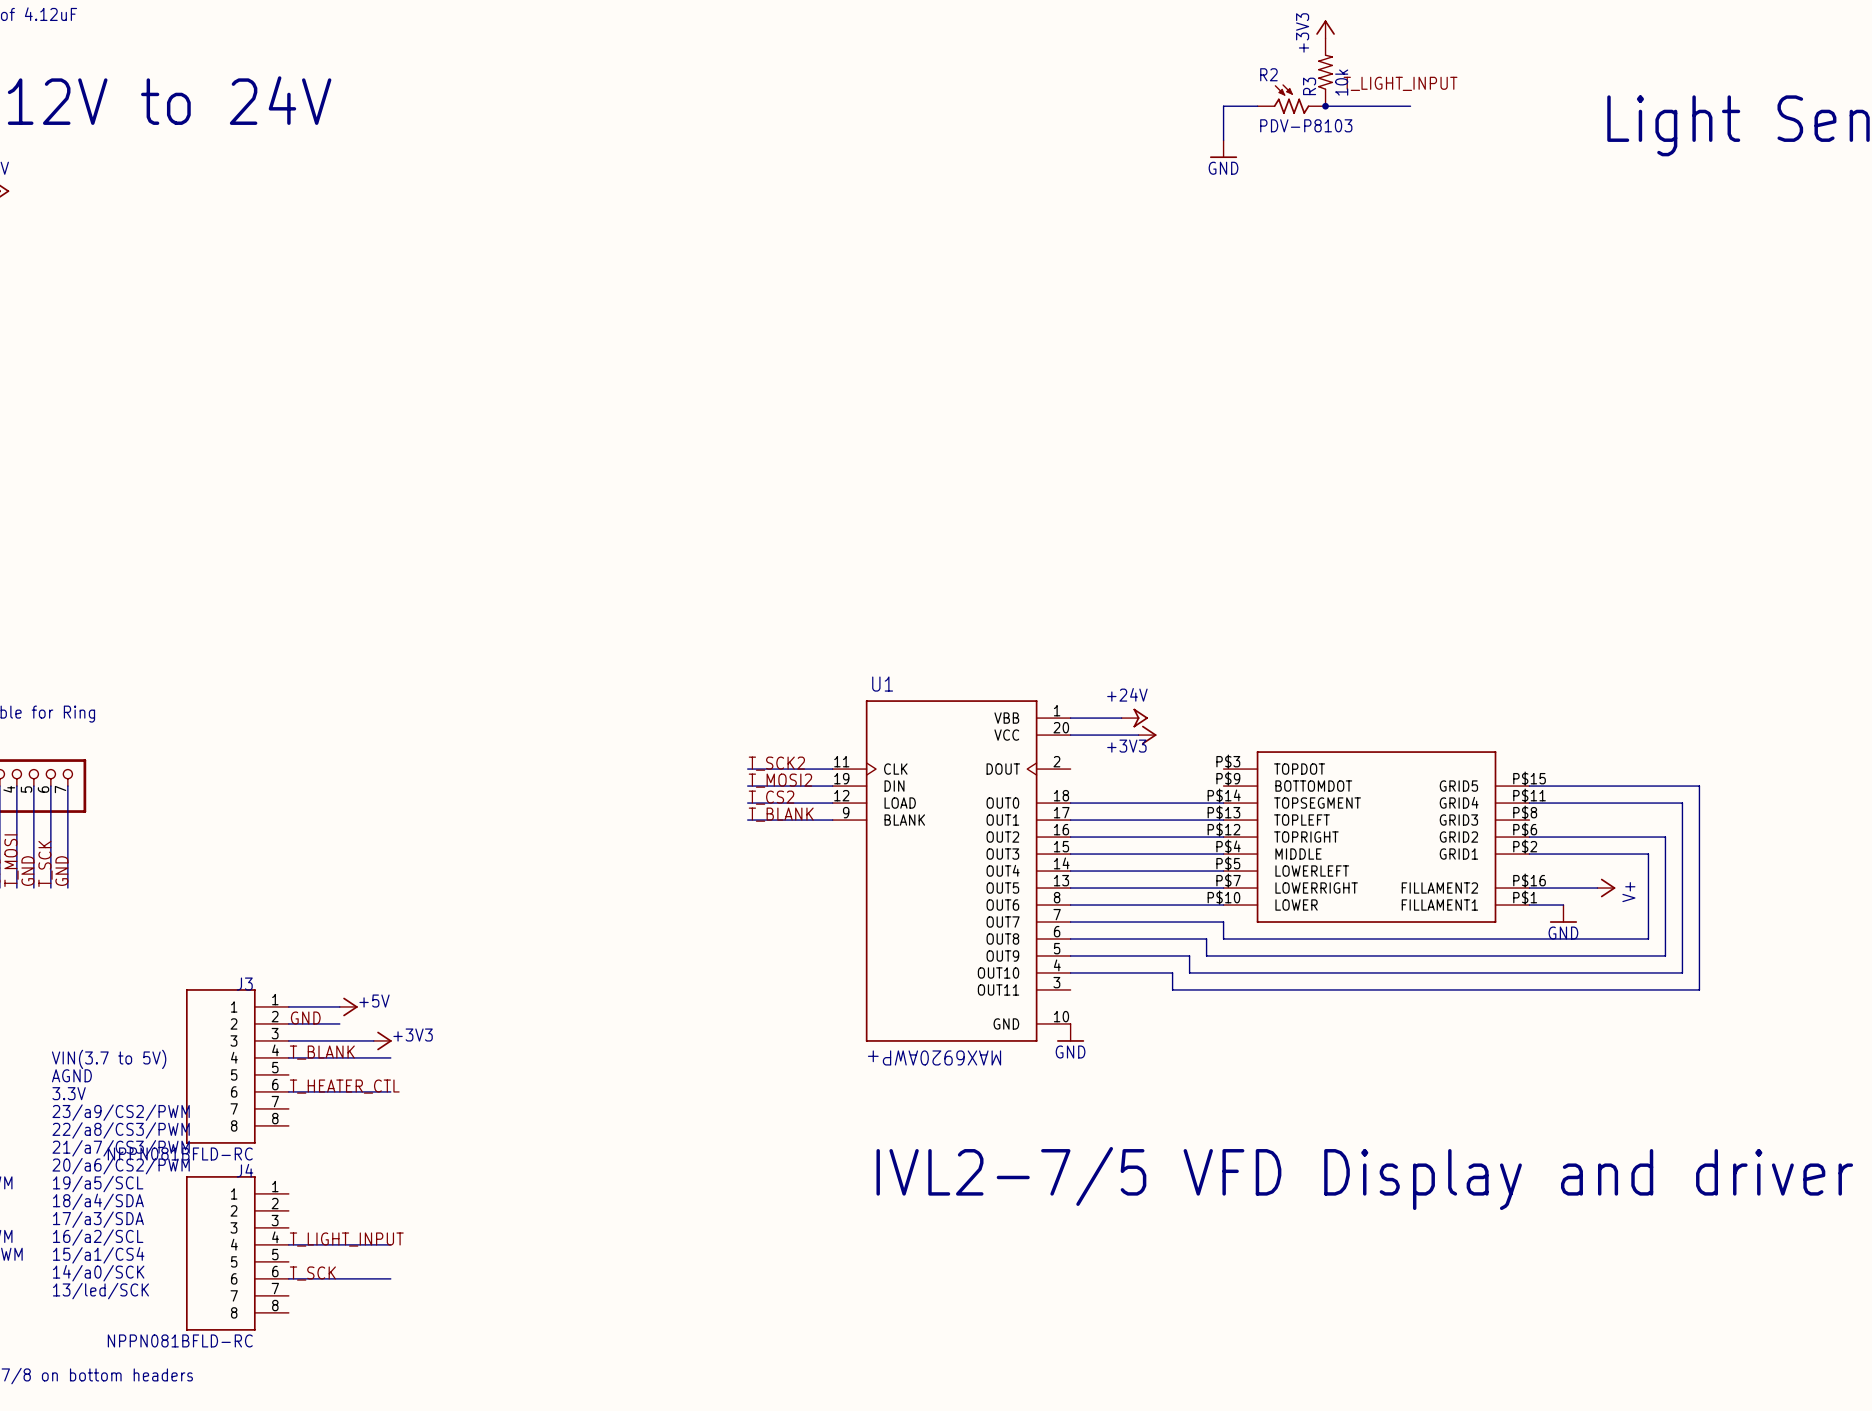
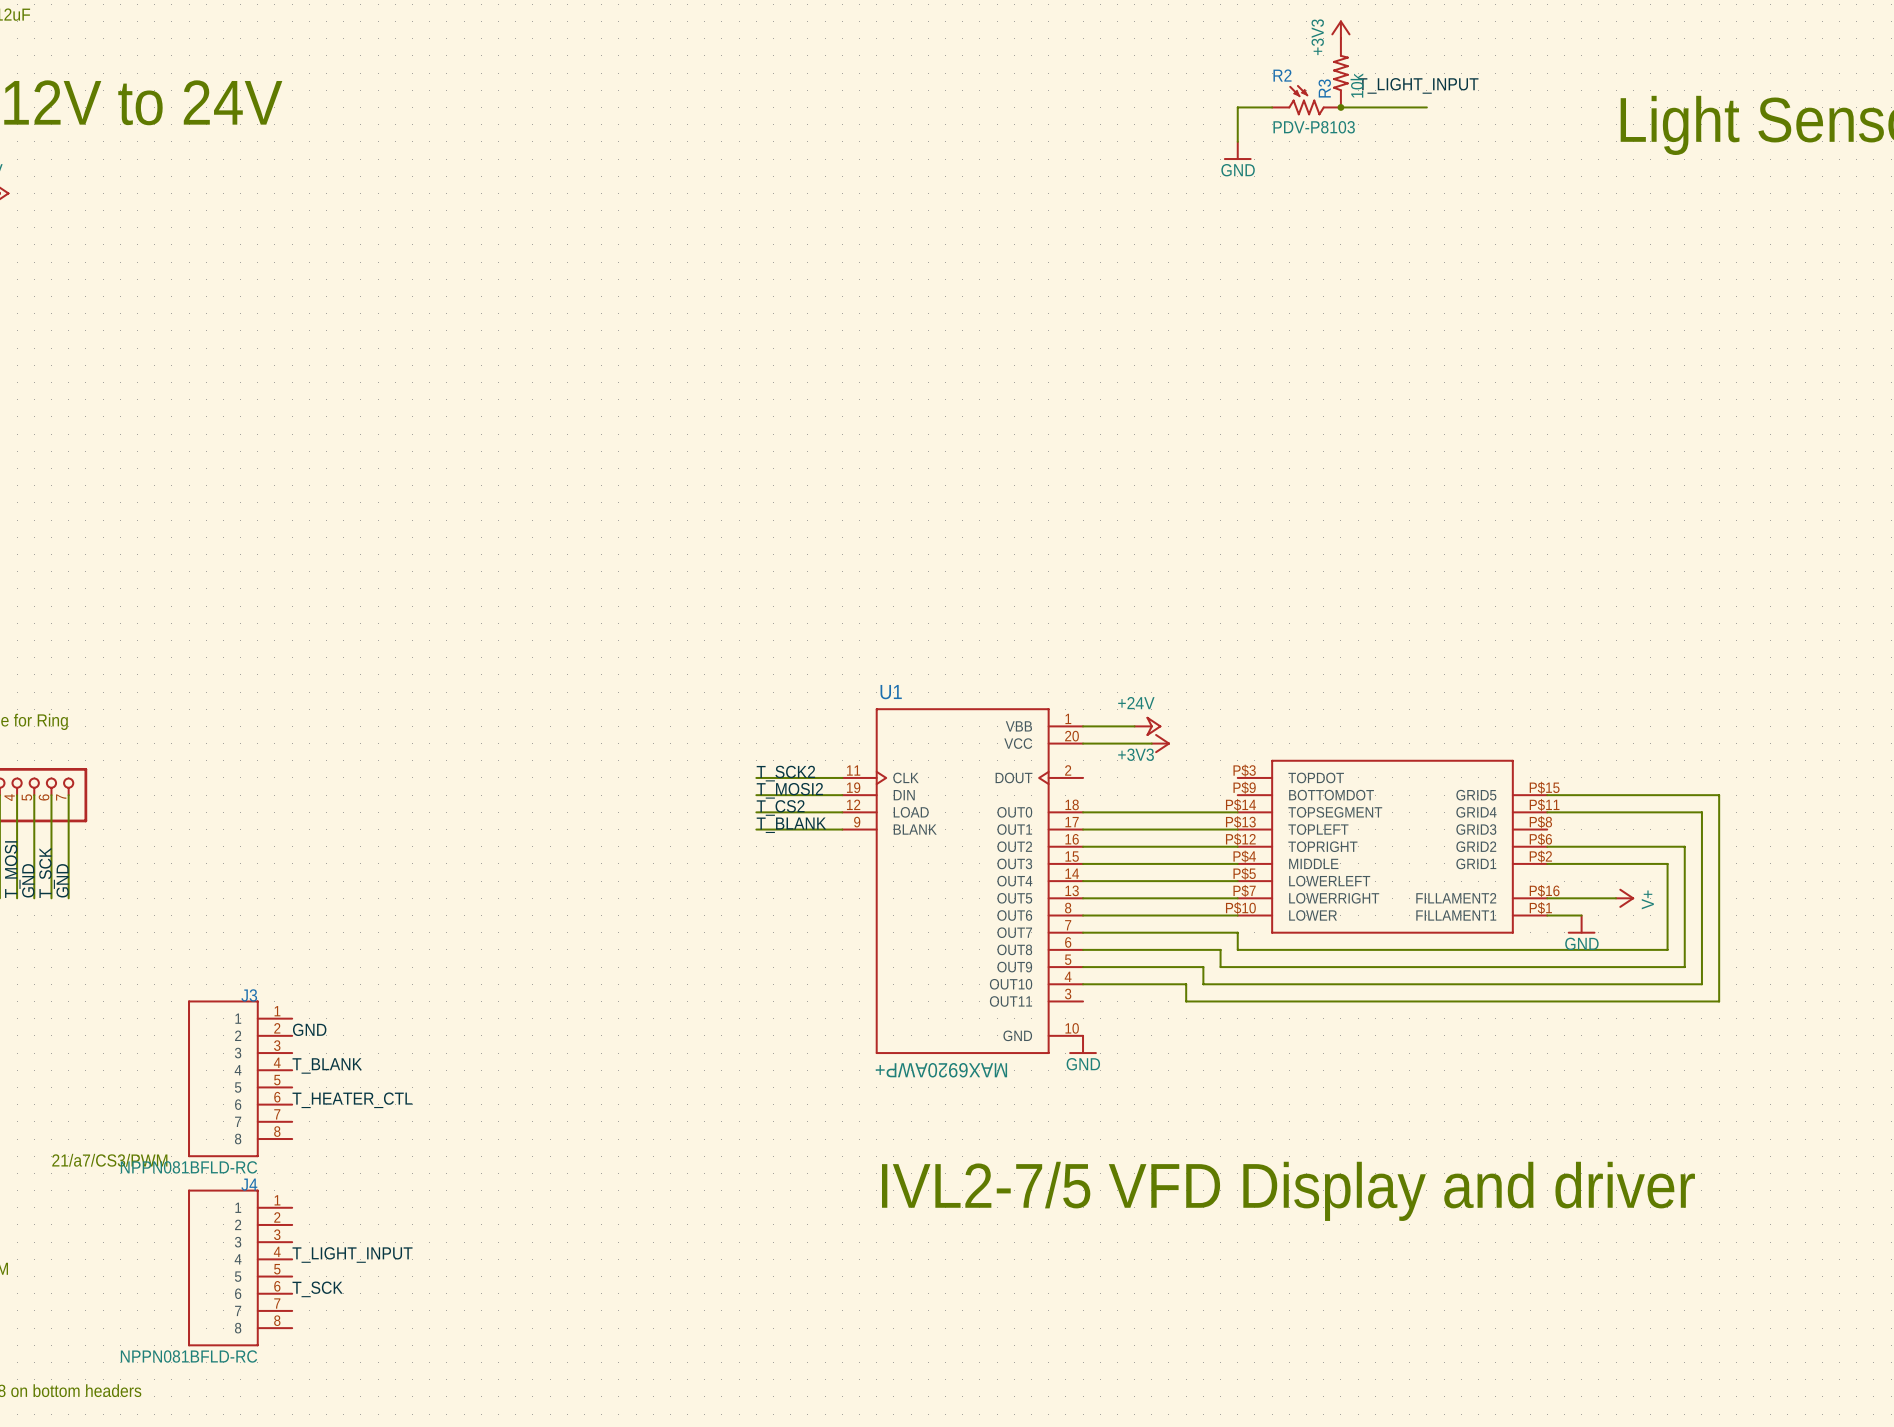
wire: (288, 1006) (339, 1006) -> none
power symbol: +5V (348, 1006) -> none
wire: (288, 1023) (339, 1023) -> none
wire: (288, 1040) (373, 1040) -> none
power symbol: +3V3 (382, 1040) -> none
wire: (288, 1057) (390, 1057) -> none
text: VIN(3.7 to 5V) (109, 1059) -> none
text: AGND (71, 1075) -> none
wire: (288, 1091) (390, 1091) -> none
text: 3.3V (69, 1093) -> none
text: 23/a9/CS2/PWM (121, 1112) -> none
text: 22/a8/CS3/PWM (121, 1130) -> none
text: 20/a6/CS2/PWM (121, 1166) -> none
text: 19/a5/SCL (98, 1184) -> none
text: 18/a4/SDA (98, 1201) -> none
text: 17/a3/SDA (98, 1219) -> none
text: 16/a2/SCL (98, 1237) -> none
wire: (288, 1244) (390, 1244) -> none
text: 15/a1/CS4 (98, 1255) -> none
text: 14/a0/SCK (98, 1273) -> none
wire: (288, 1278) (390, 1278) -> none
text: 13/led/SCK (100, 1291) -> none

